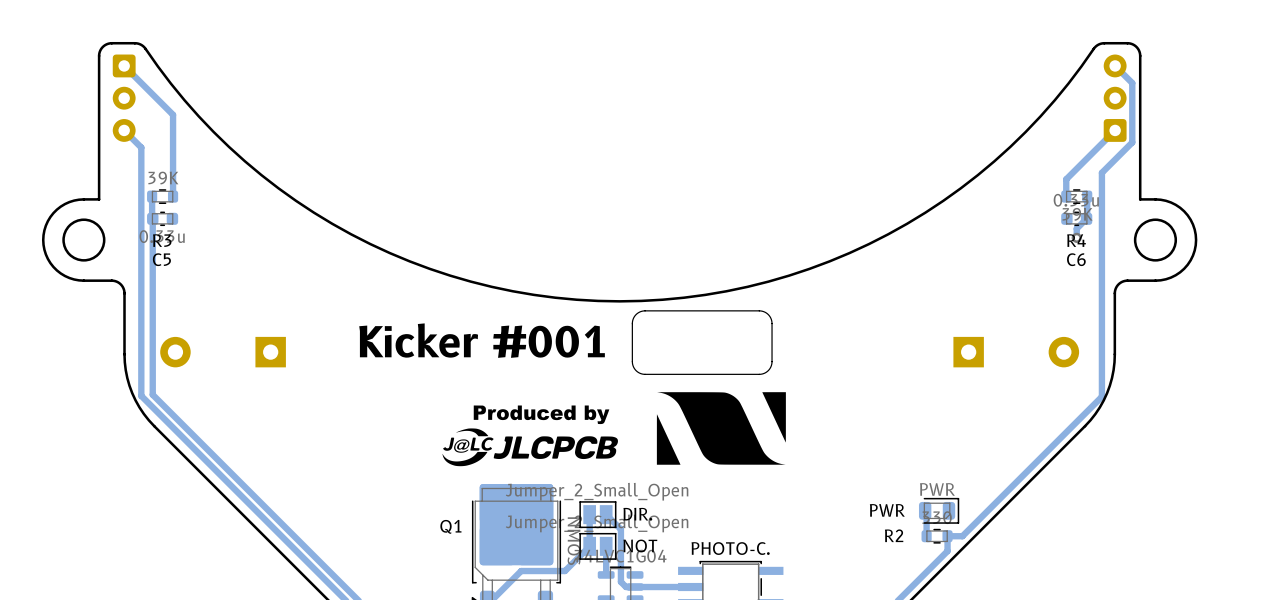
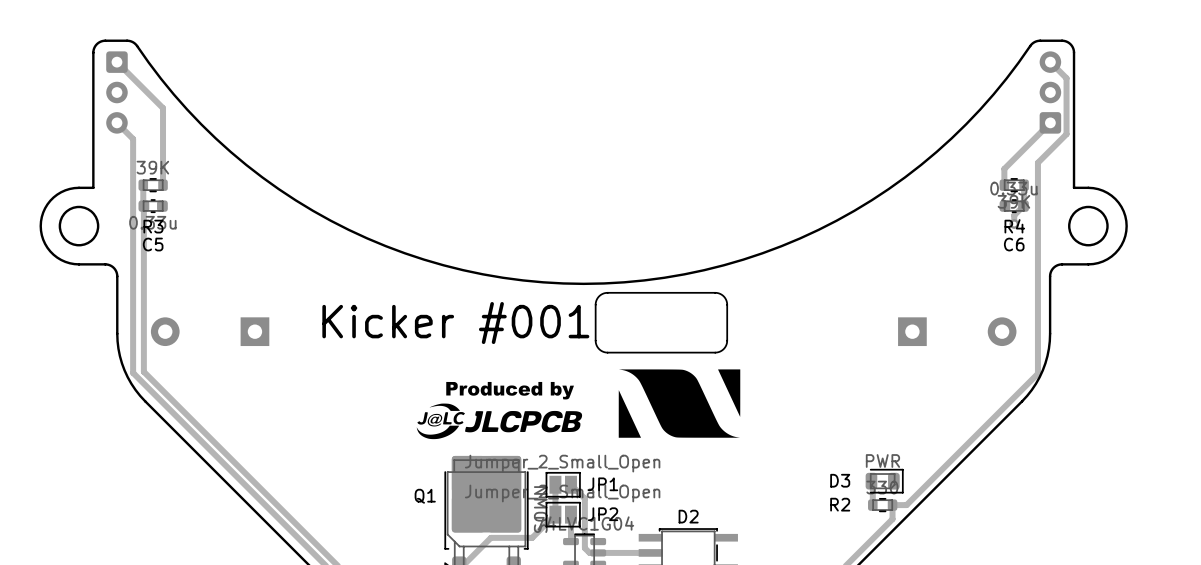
PWR name: PWR (887, 510) -> D3 (840, 480)
DIR. name: DIR. (637, 514) -> JP1 (603, 484)
NOT name: NOT (640, 545) -> JP2 (603, 514)
PHOTO-C. name: PHOTO-C. (730, 548) -> D2 (688, 516)

